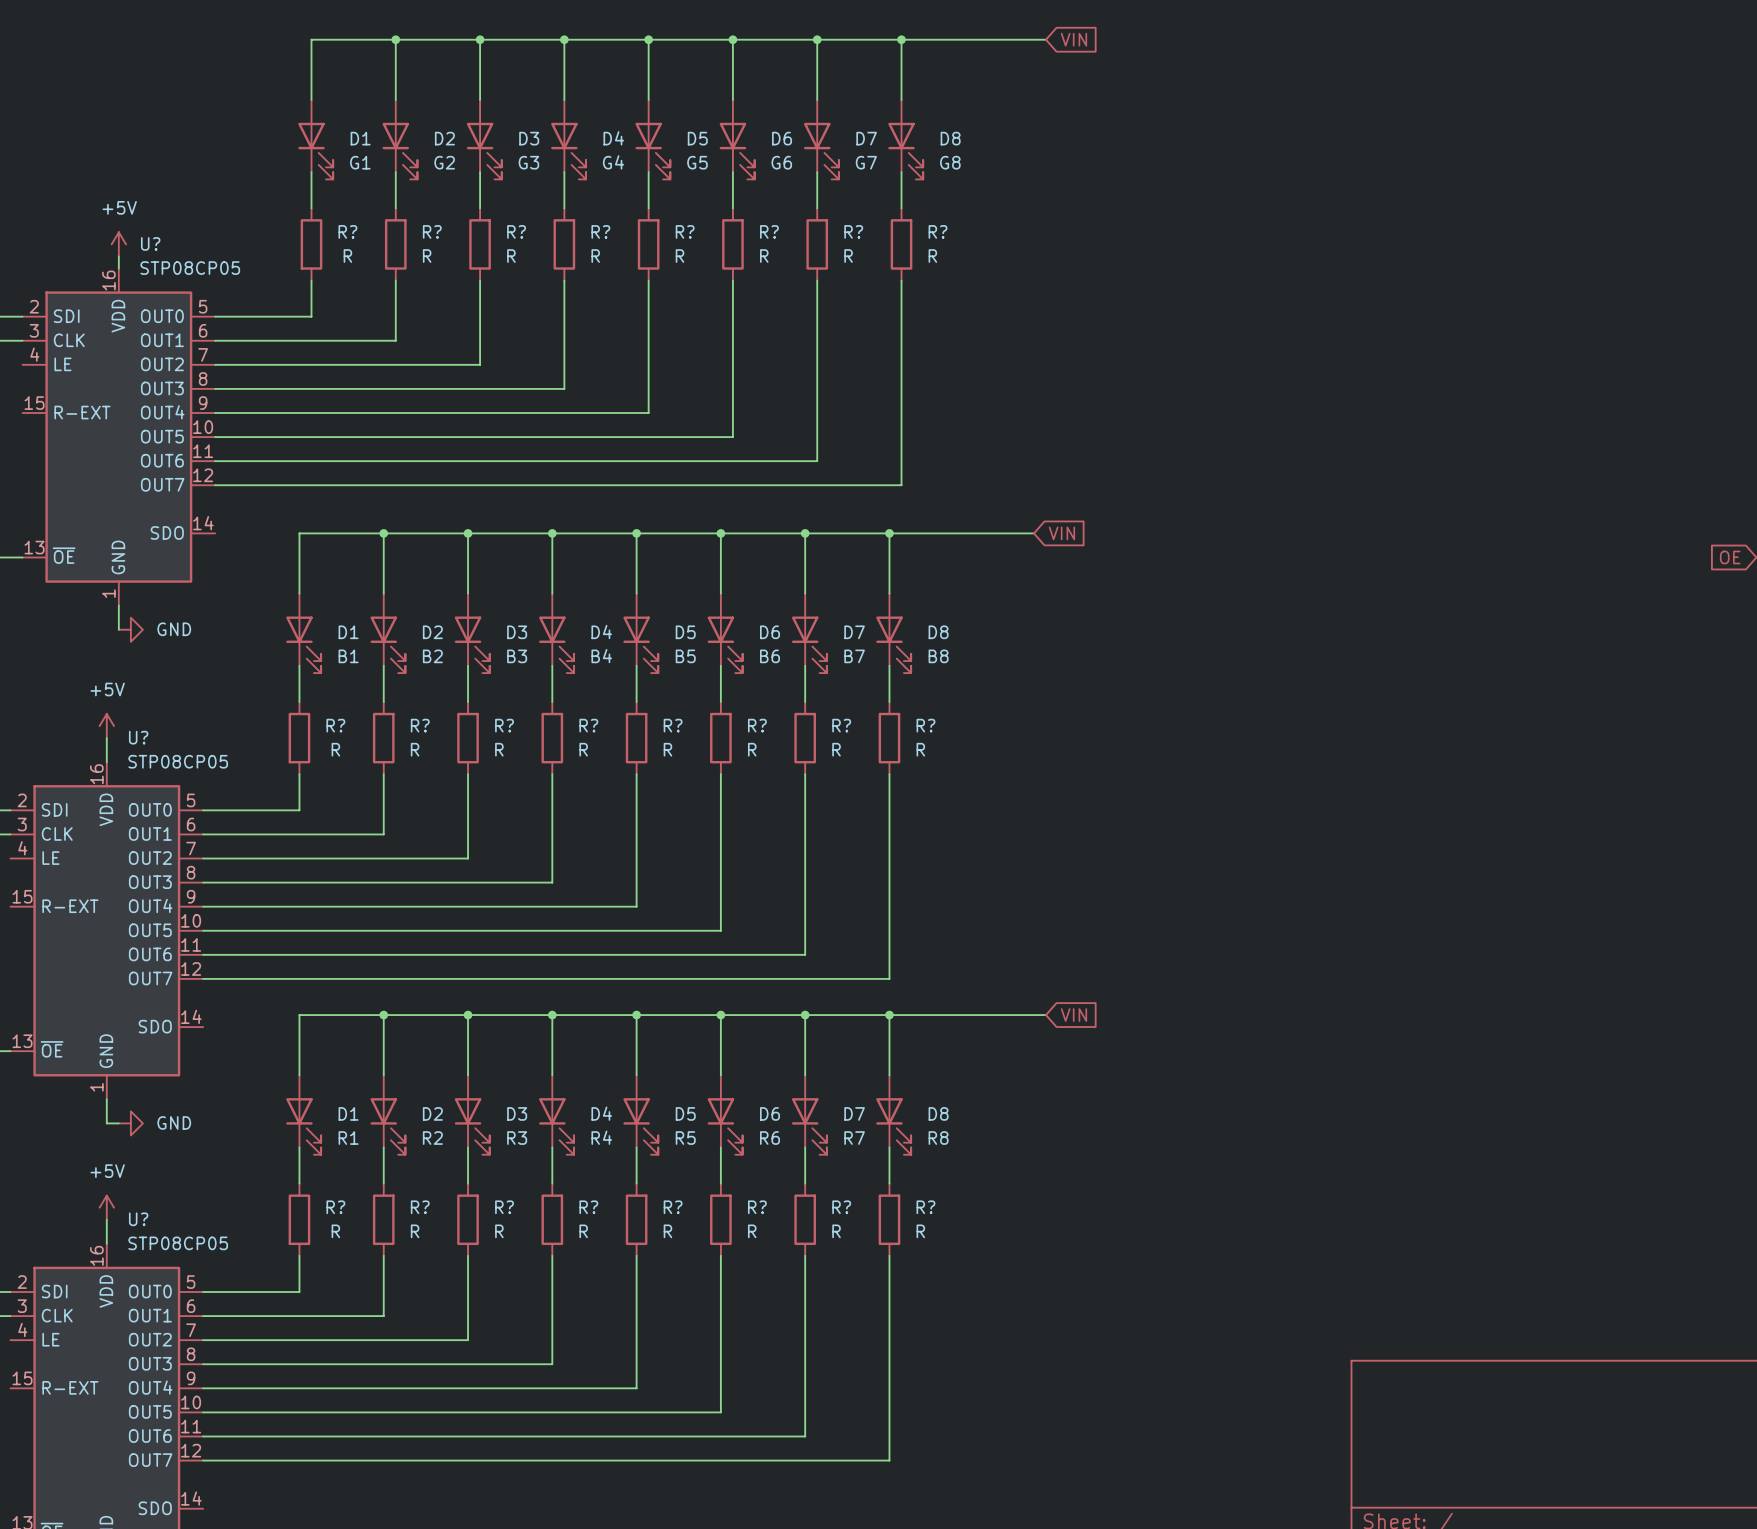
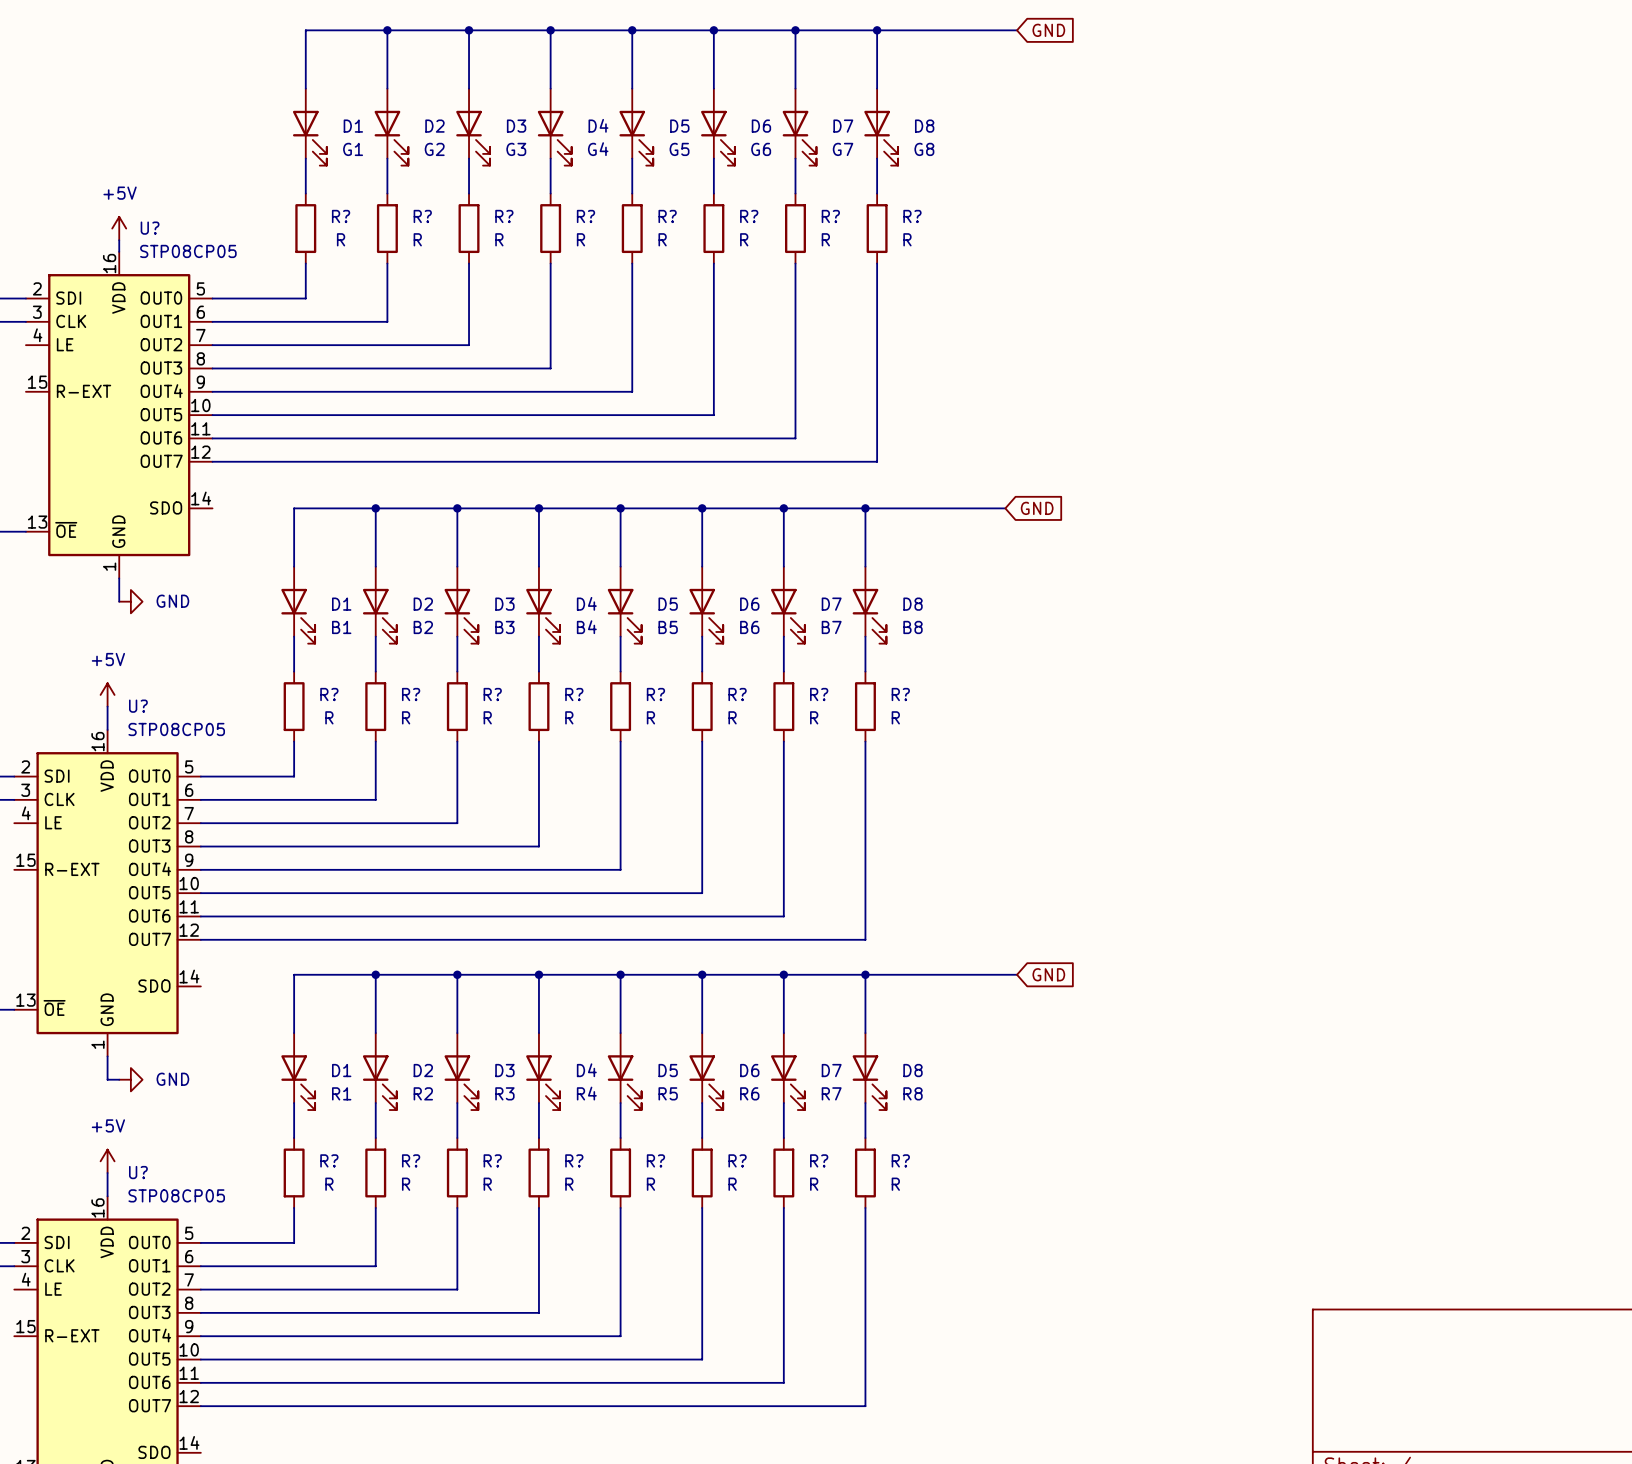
global label: VIN (1073, 39) -> GND (1048, 30)
global label: VIN (1061, 533) -> GND (1037, 508)
global label: VIN (1073, 1015) -> GND (1048, 974)

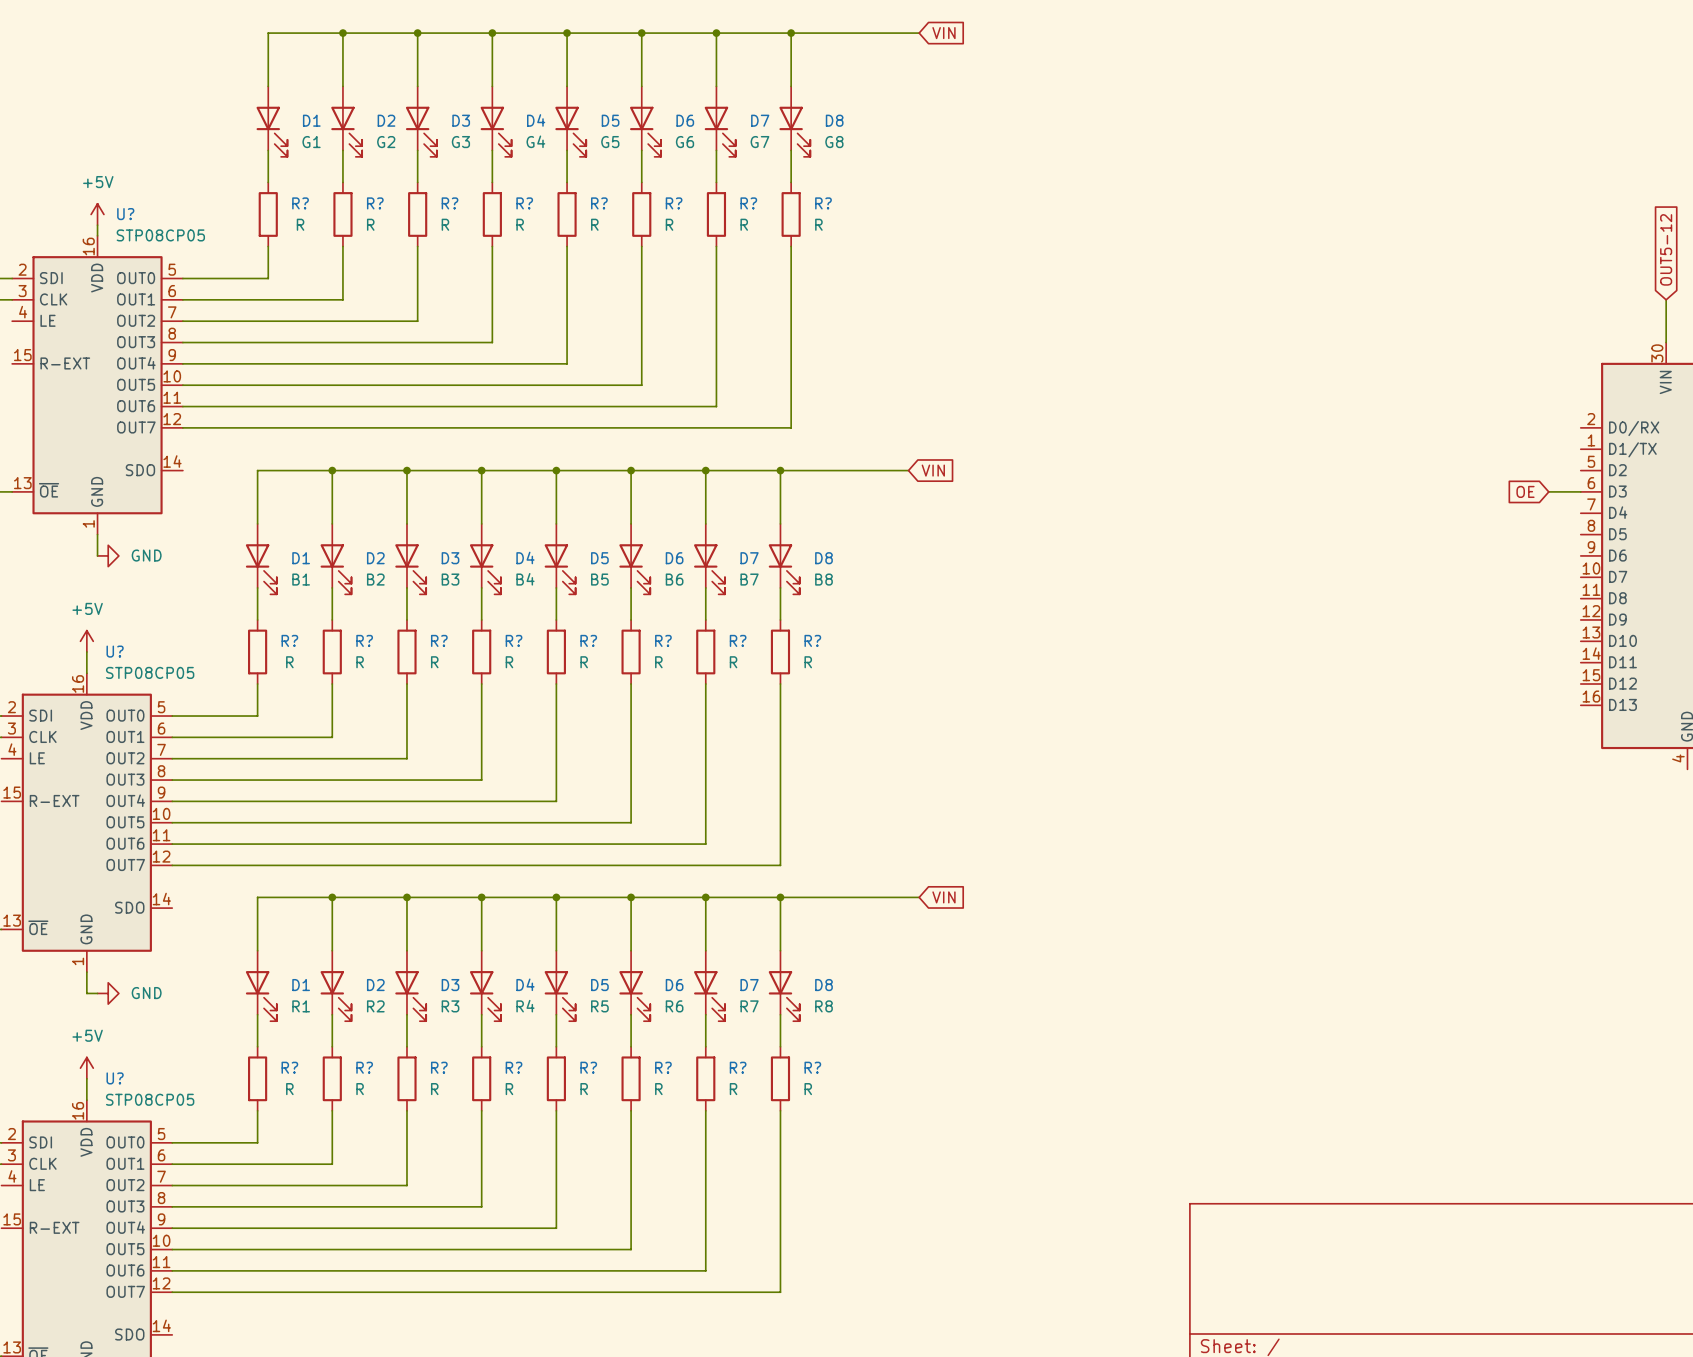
global label: GND (1048, 30) -> VIN (943, 33)
global label: GND (1037, 508) -> VIN (933, 470)
global label: GND (1048, 974) -> VIN (943, 897)

